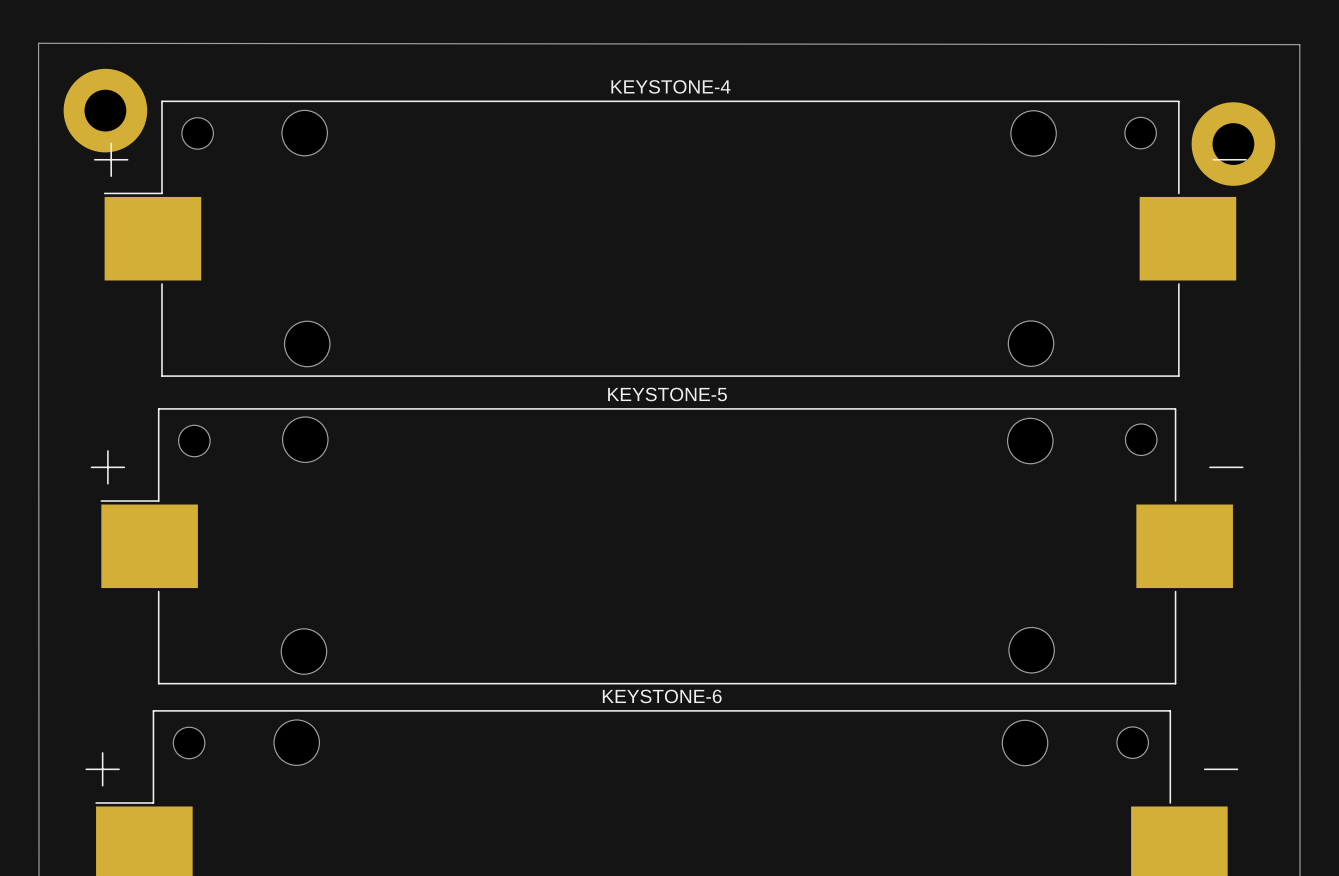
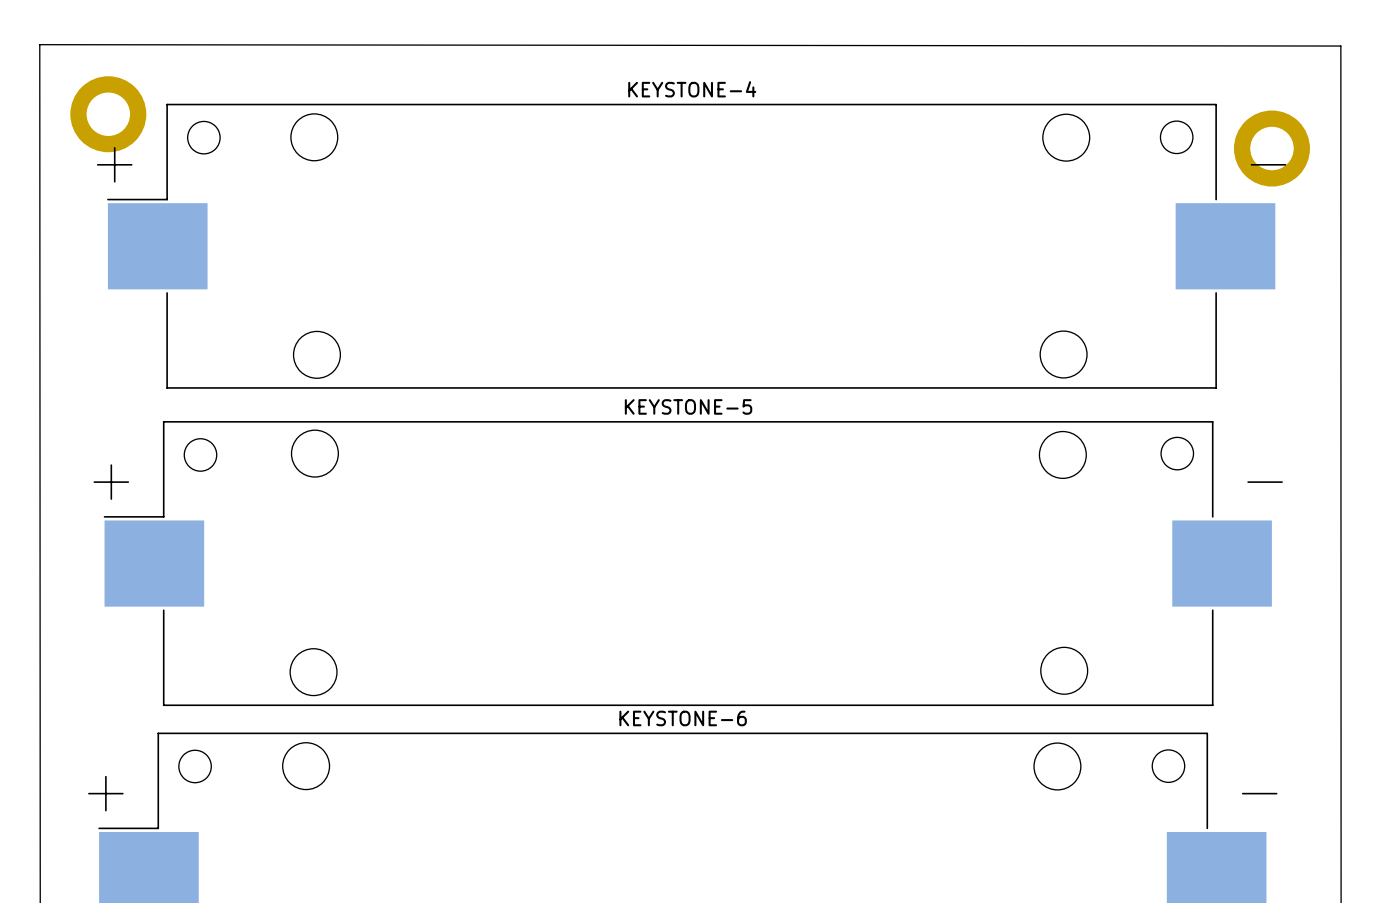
part footprint: [63, 68, 148, 153] -> [70, 76, 147, 153]
part footprint: [1191, 102, 1276, 186] -> [1233, 110, 1310, 187]

